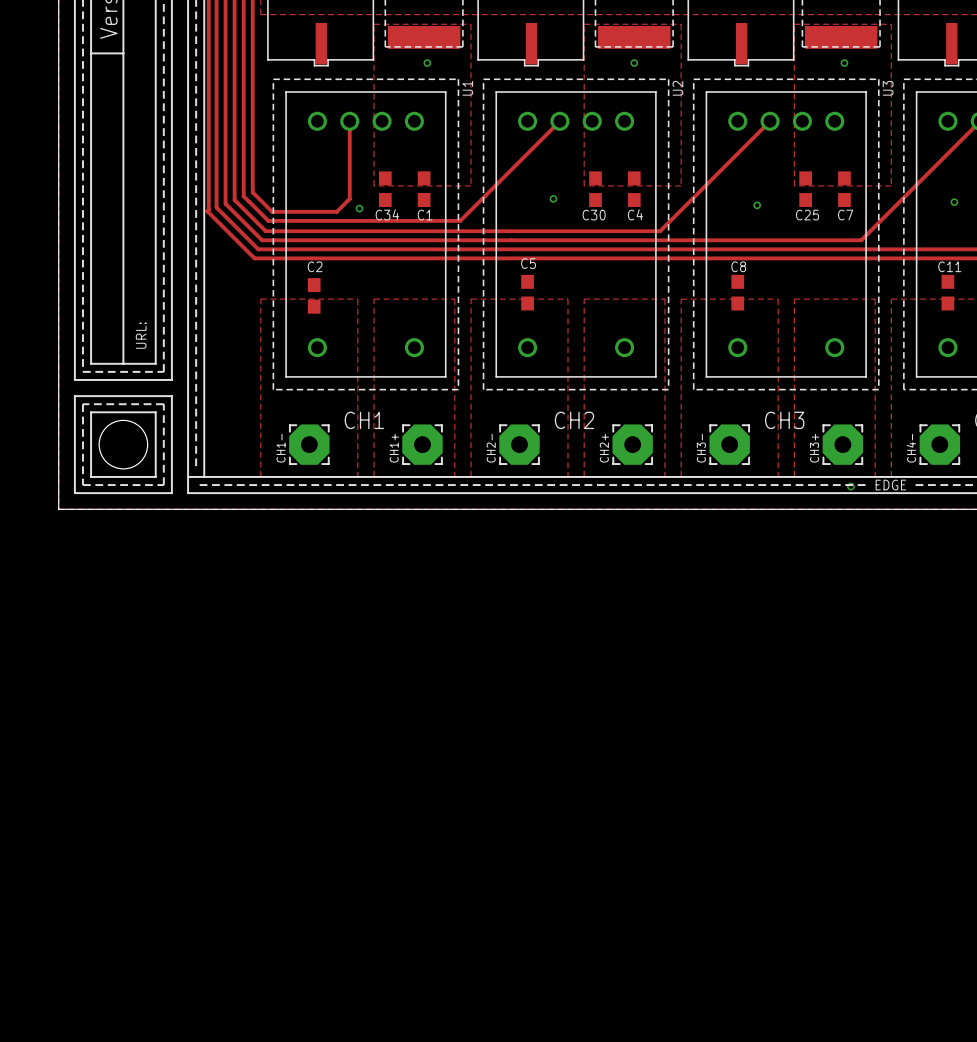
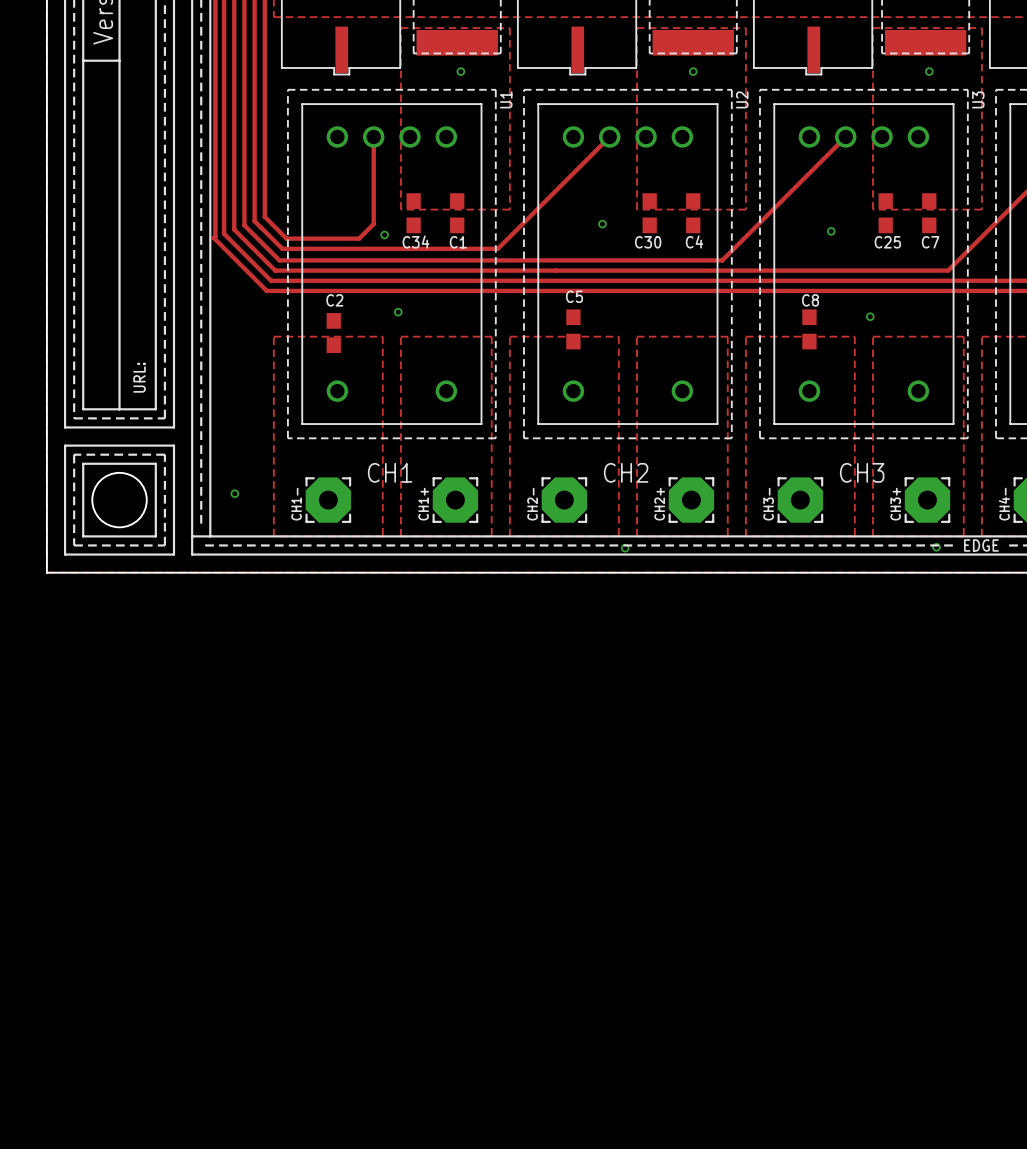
via: none -> (398, 312)
via: none -> (870, 316)
via: none -> (234, 493)
via: none -> (625, 548)

